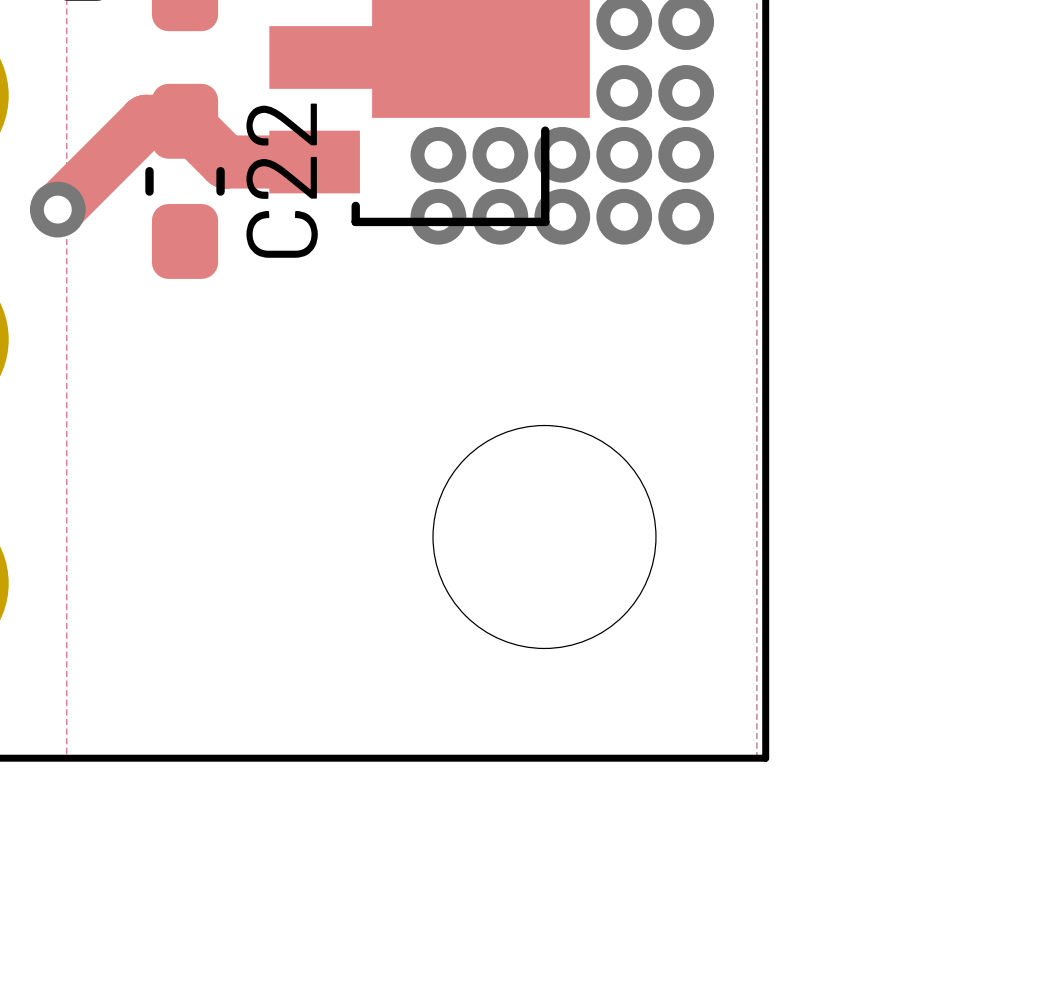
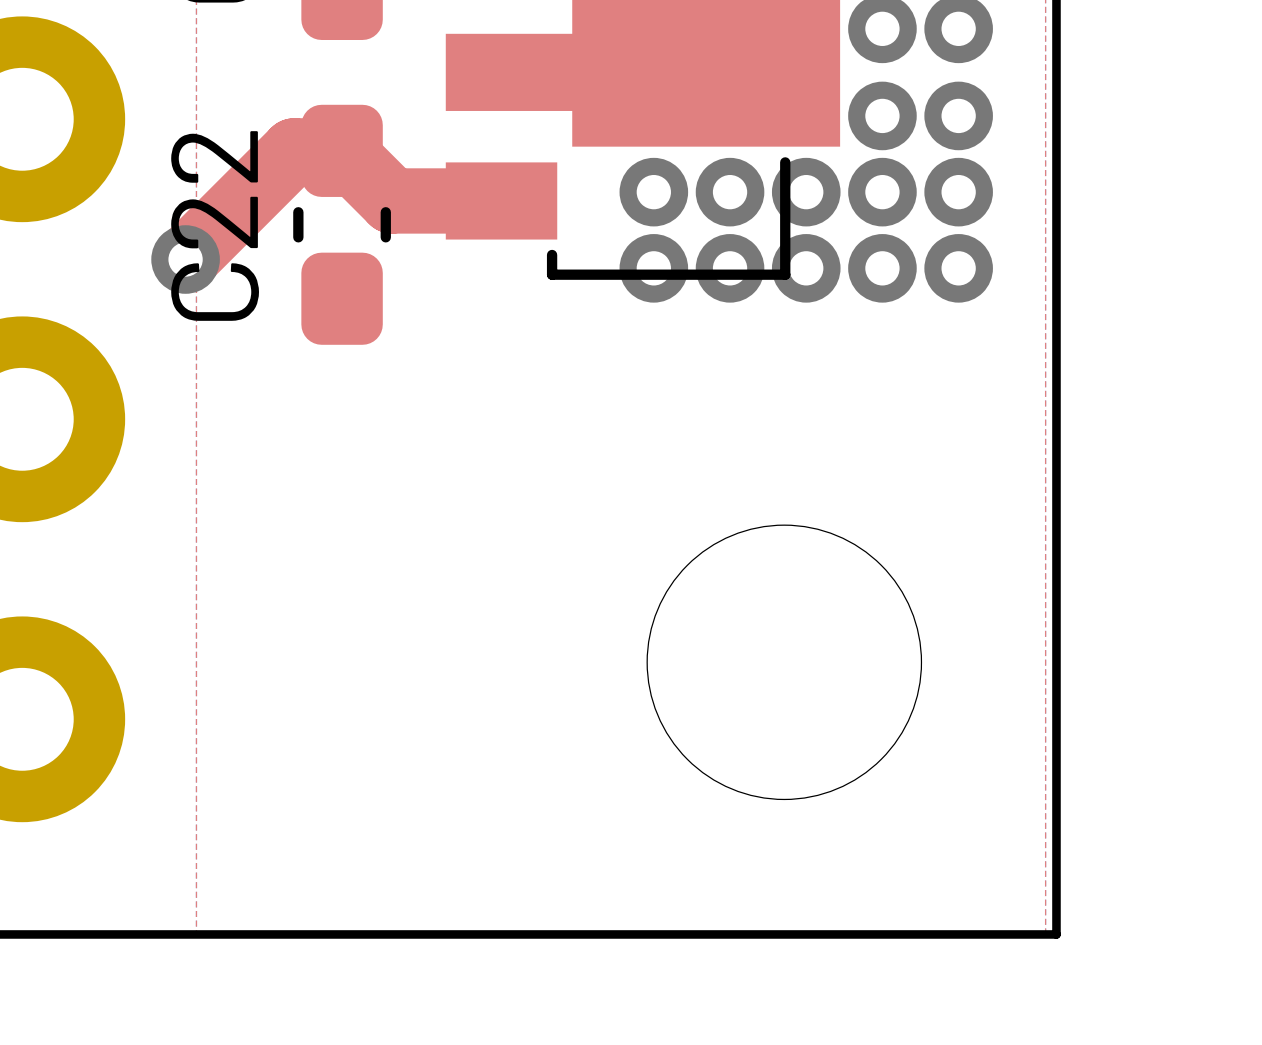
C22 name position: C22 (282, 180) -> C22 (215, 226)

